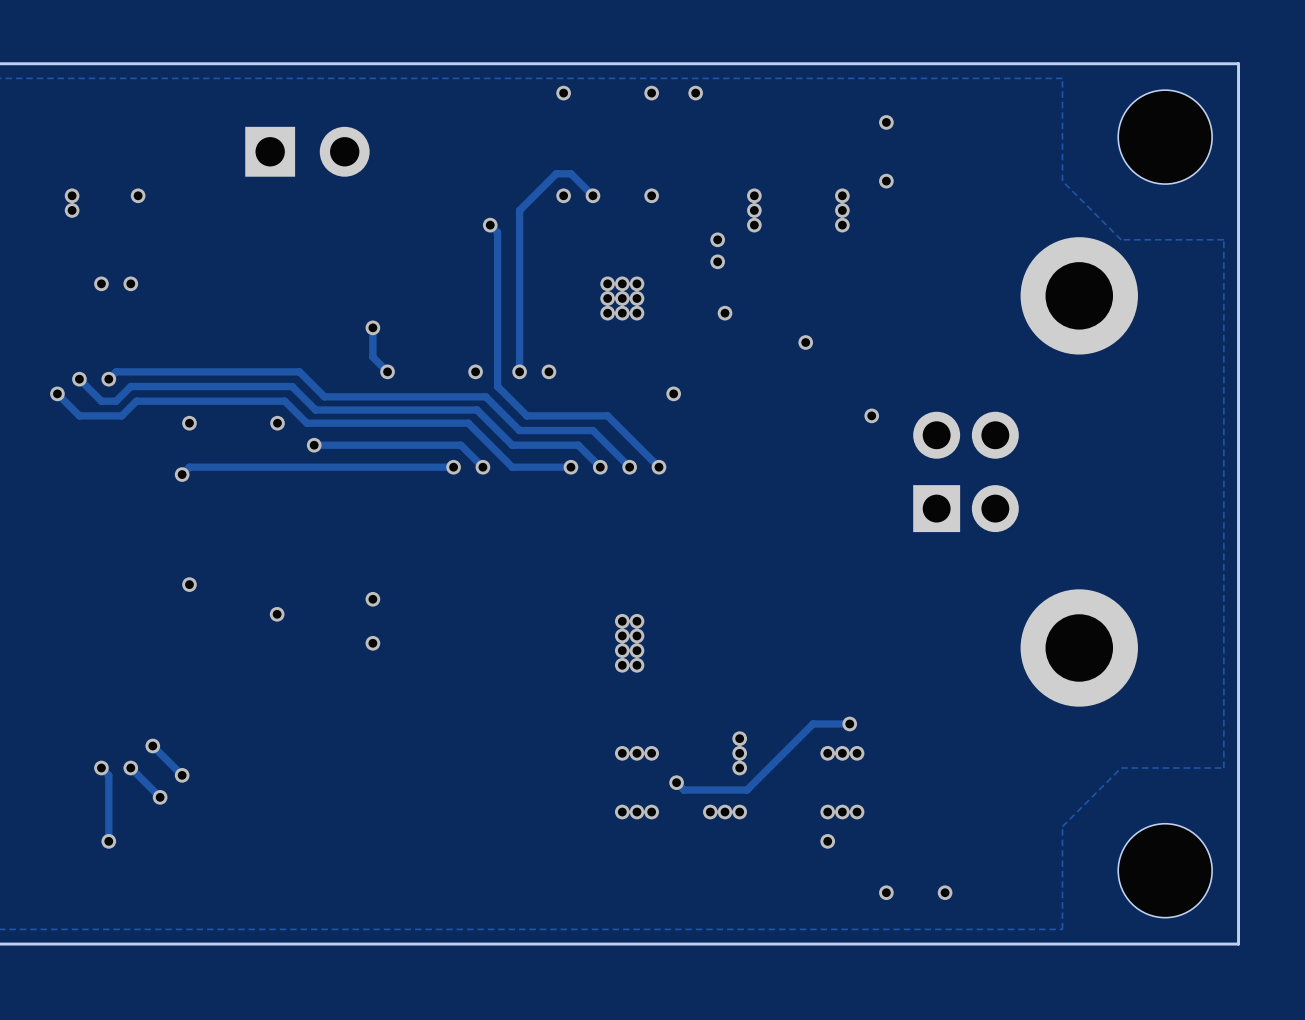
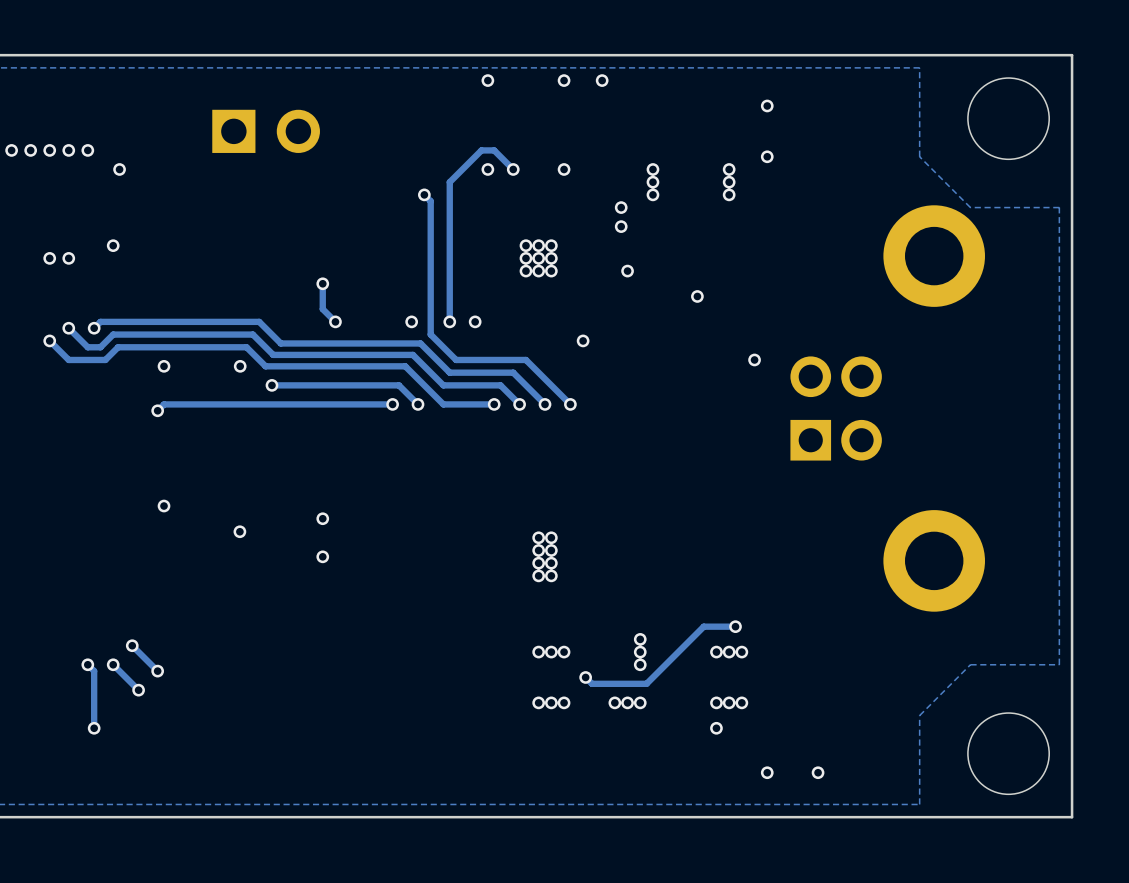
via: none -> (11, 150)
via: none -> (30, 150)
via: none -> (49, 150)
via: none -> (68, 150)
via: none -> (87, 150)
via: (72, 195) -> none
via: (72, 210) -> none
via: (101, 283) -> none
via: none -> (49, 258)
via: none -> (68, 258)

